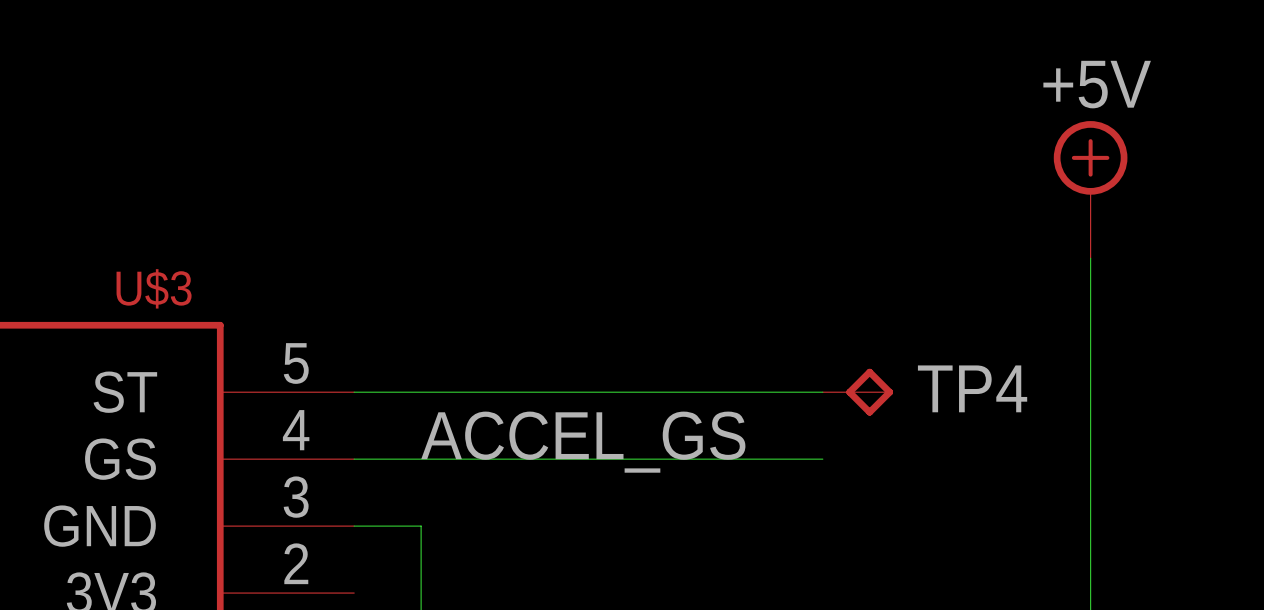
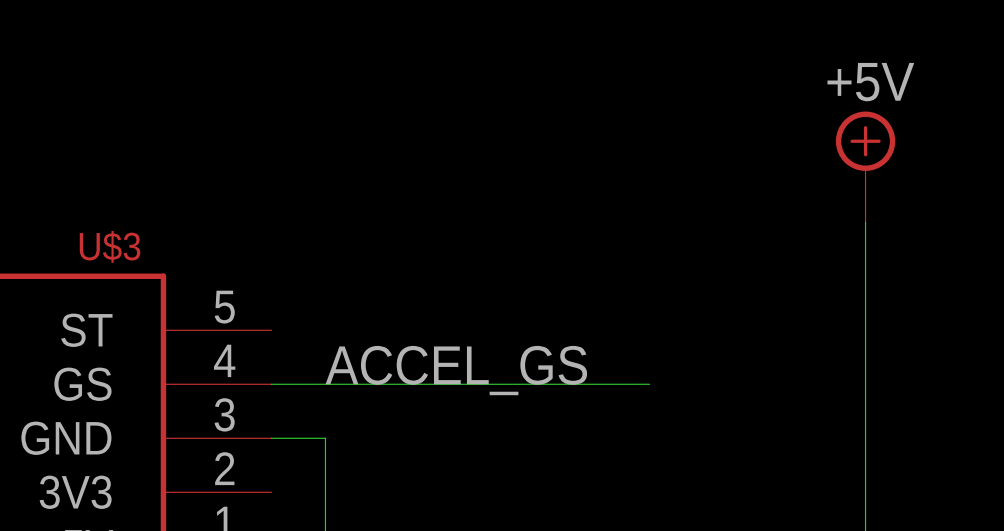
wire: (354, 392) (822, 392) -> none
TP4: (857, 392) -> none

